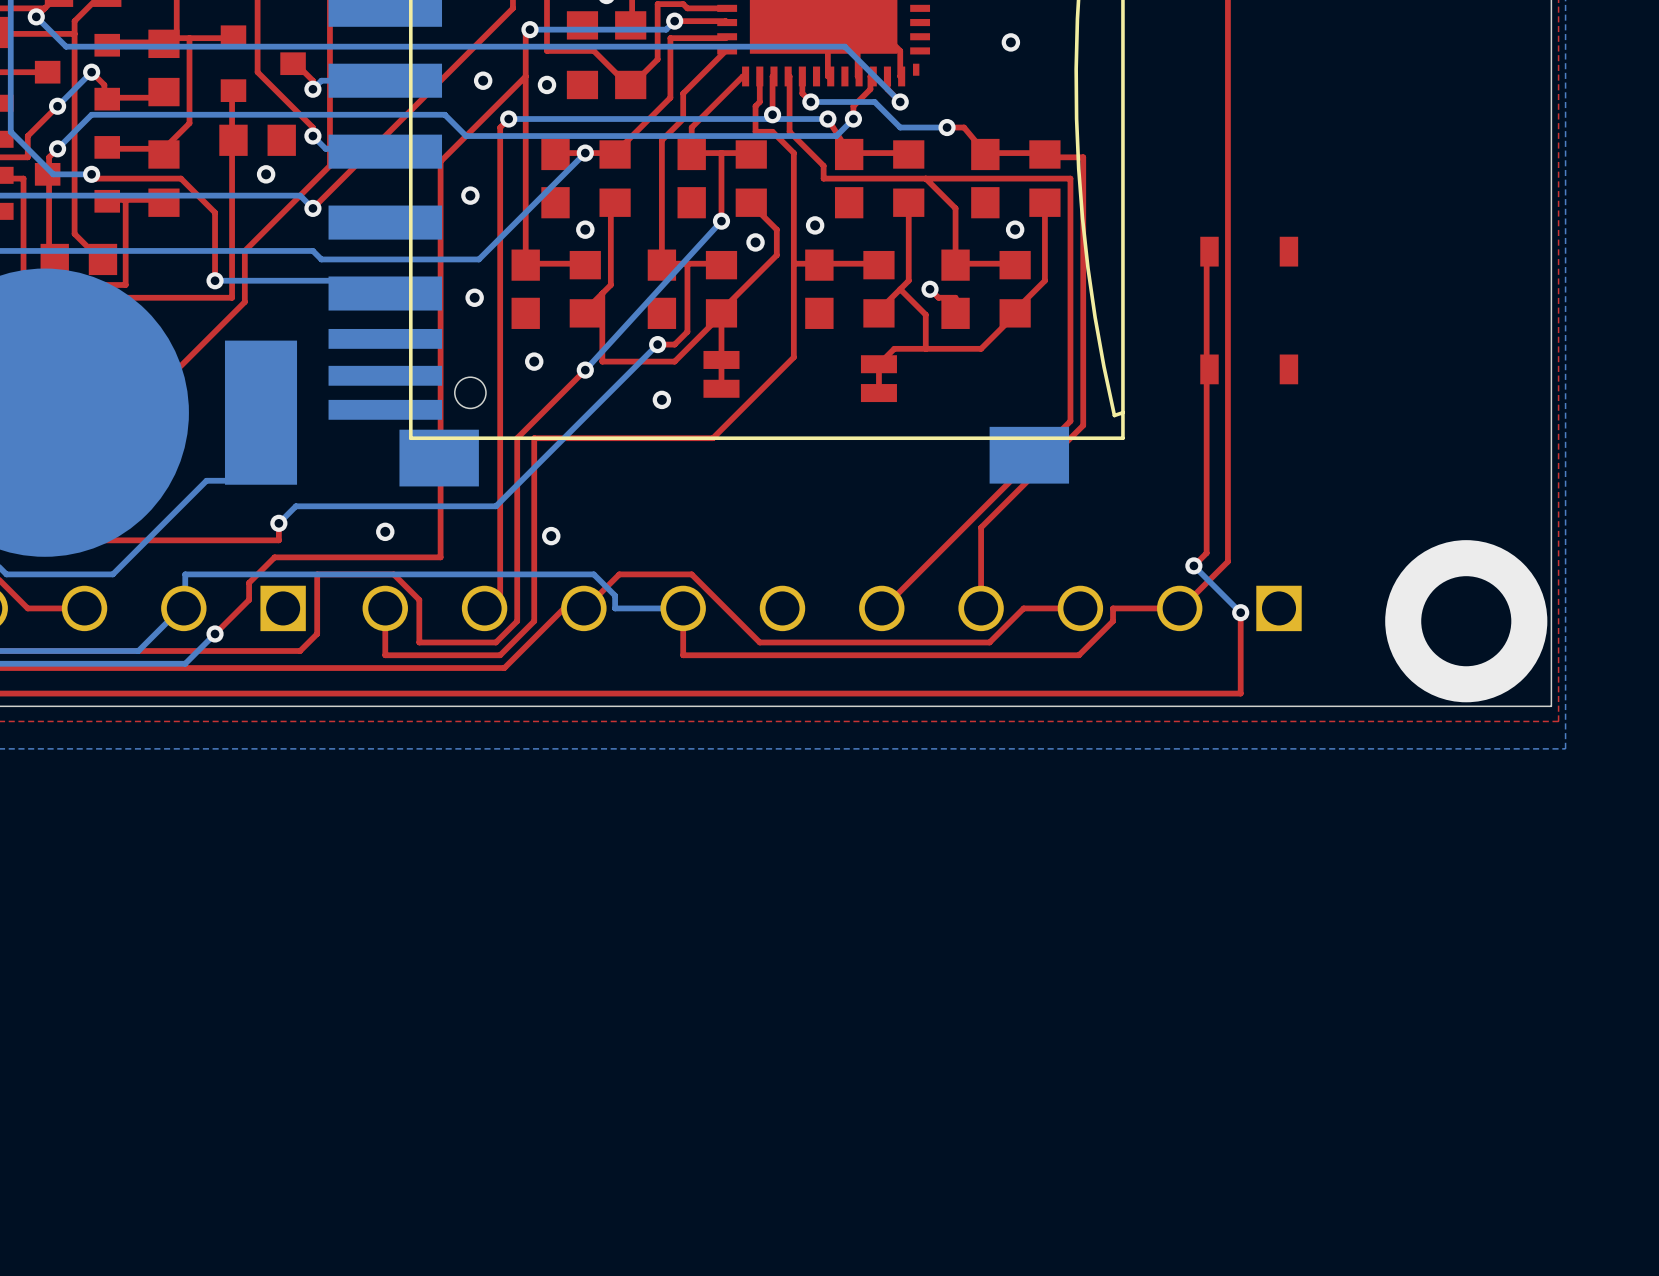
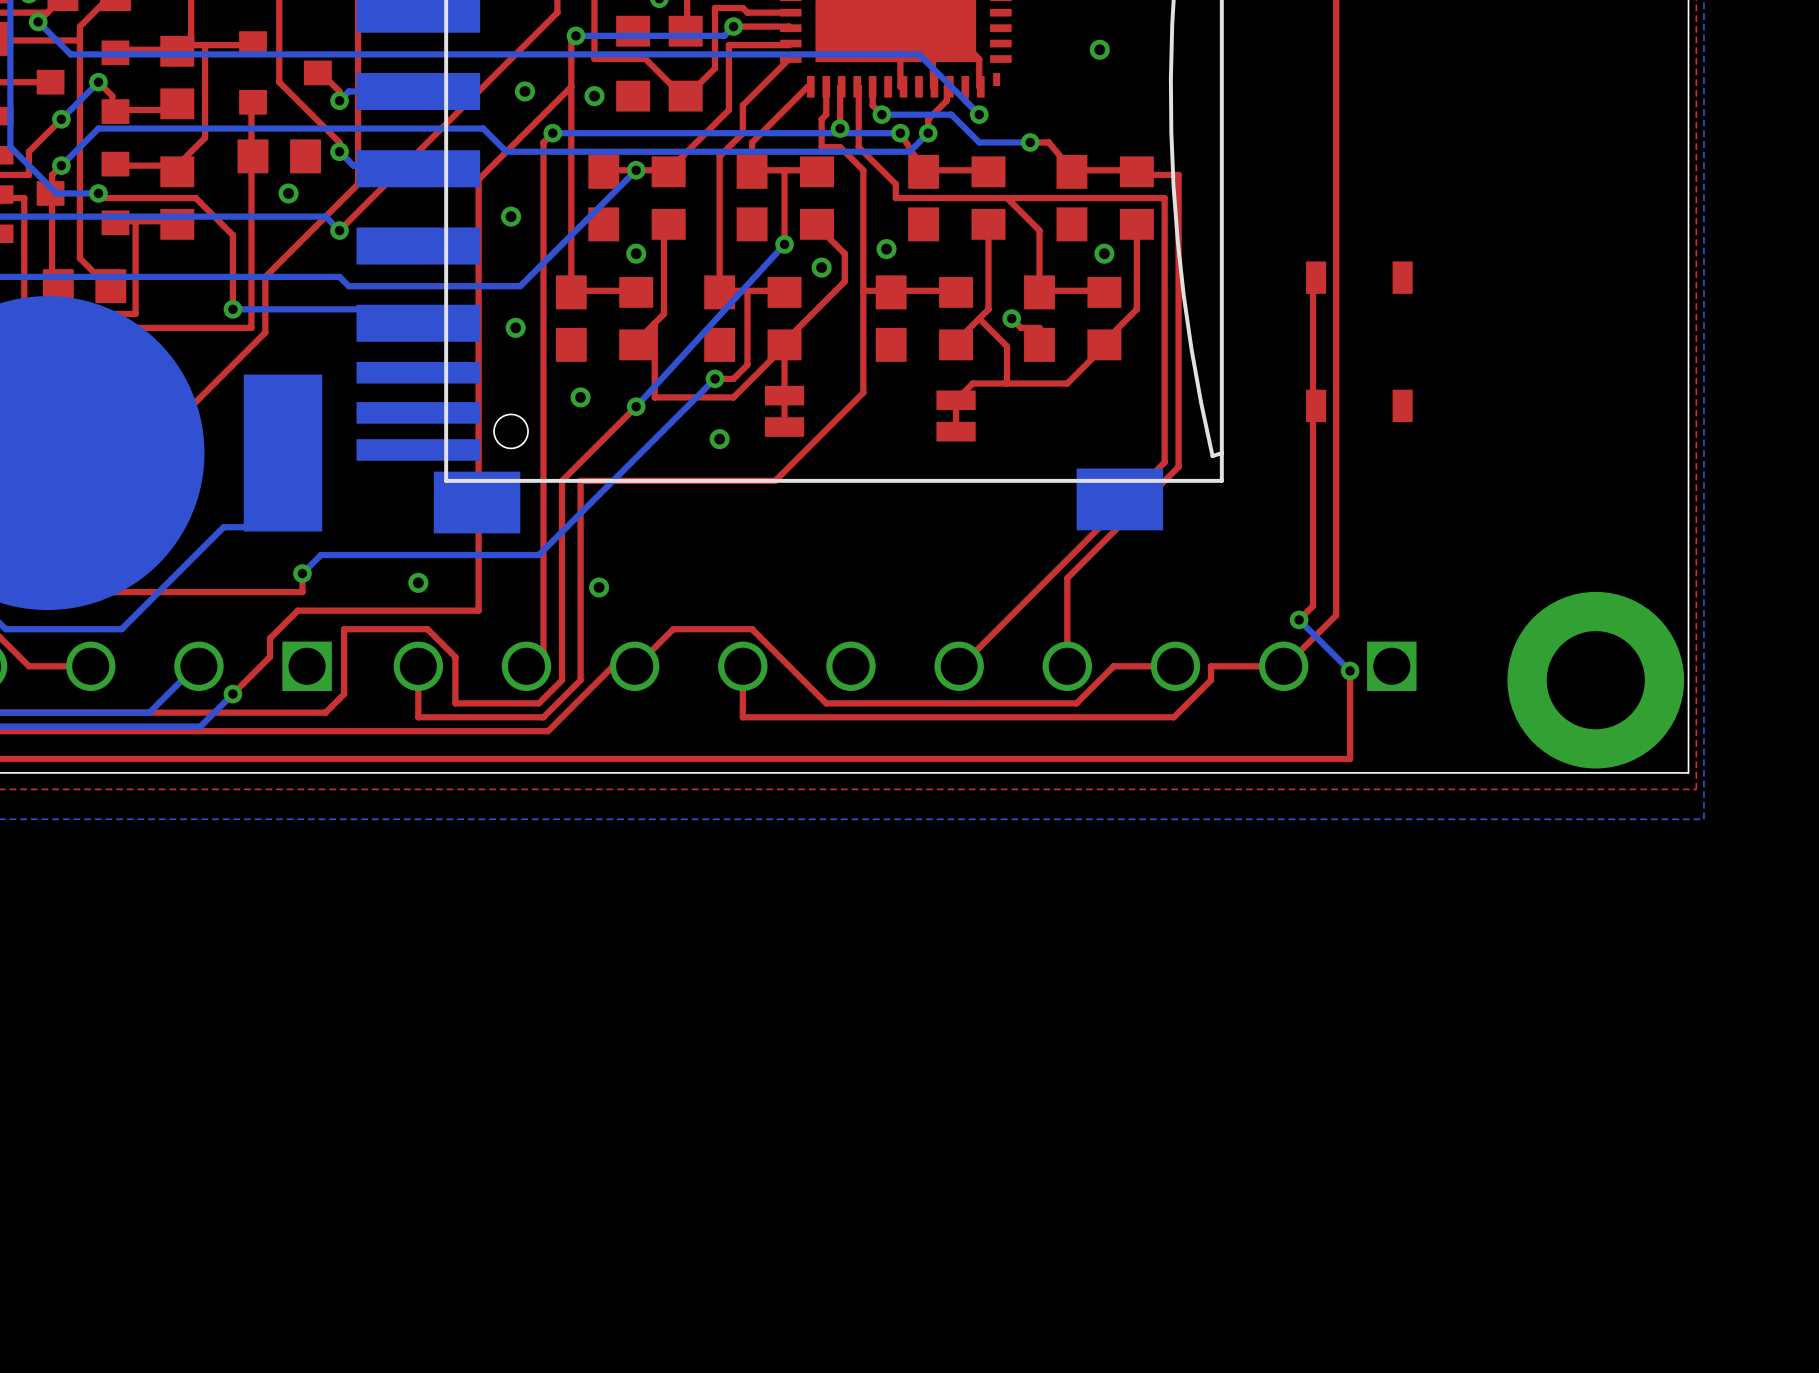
bottom track: (683, 608) (615, 608) (615, 595) (593, 574) (185, 574) (183, 608) -> none

